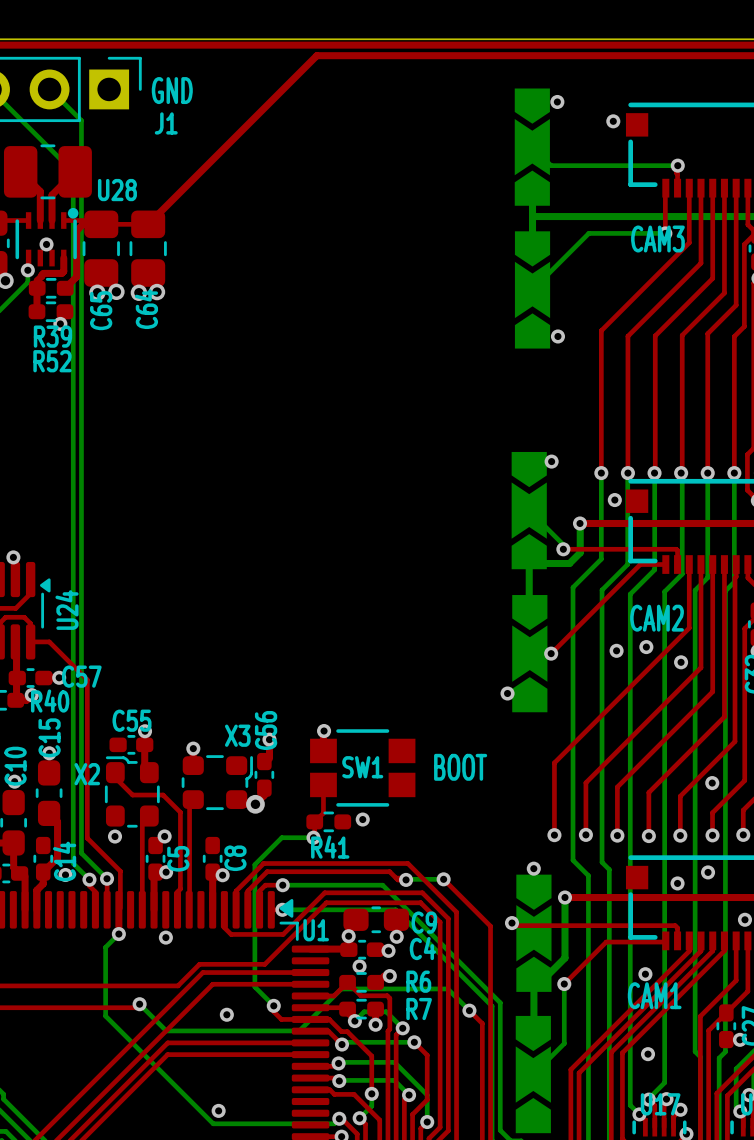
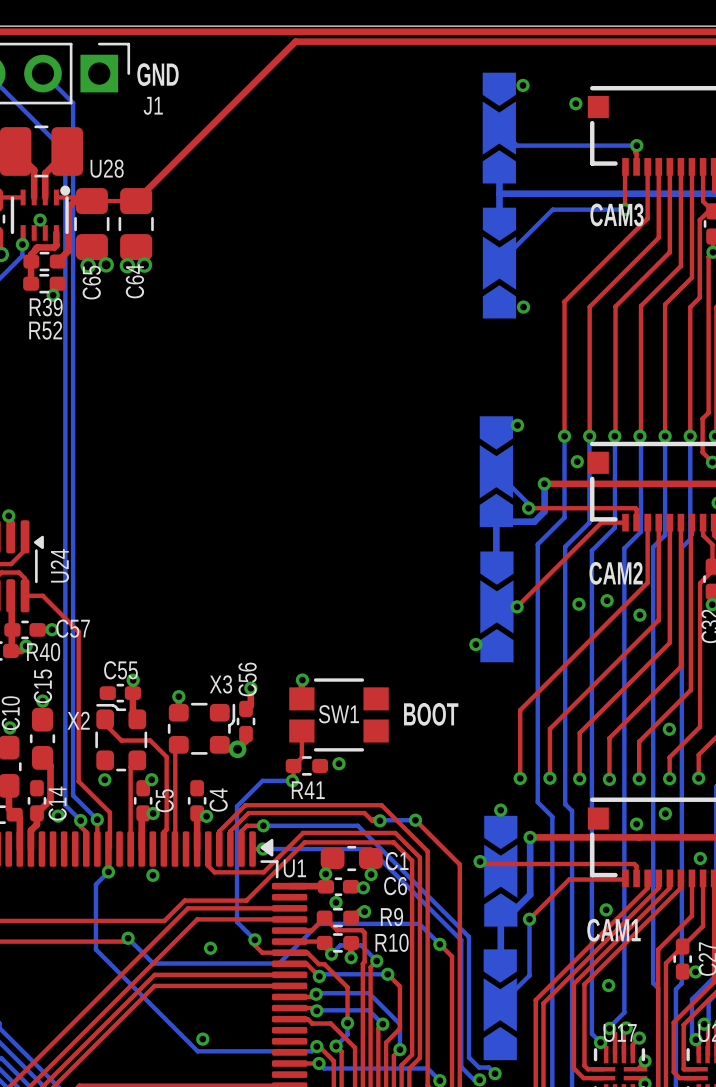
C8 name: C8 (235, 858) -> C4 (218, 800)
C9 name: C9 (424, 922) -> C1 (397, 861)
C4 name: C4 (422, 948) -> C6 (395, 886)
R6 name: R6 (418, 981) -> R9 (391, 916)
R7 name: R7 (419, 1009) -> R10 (392, 942)

